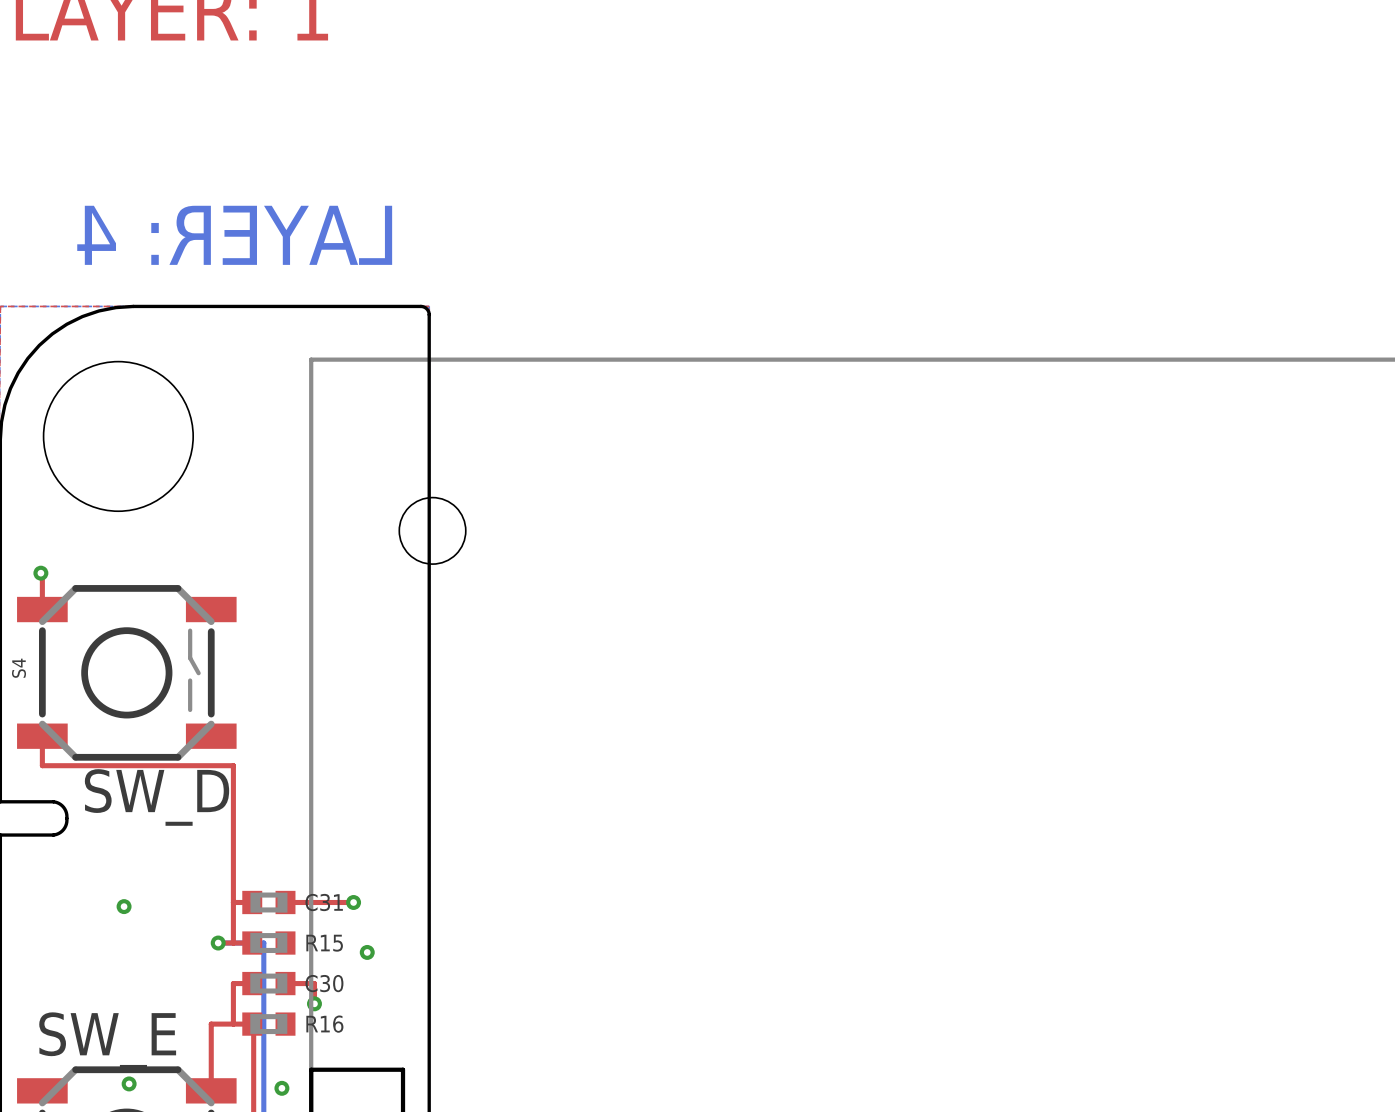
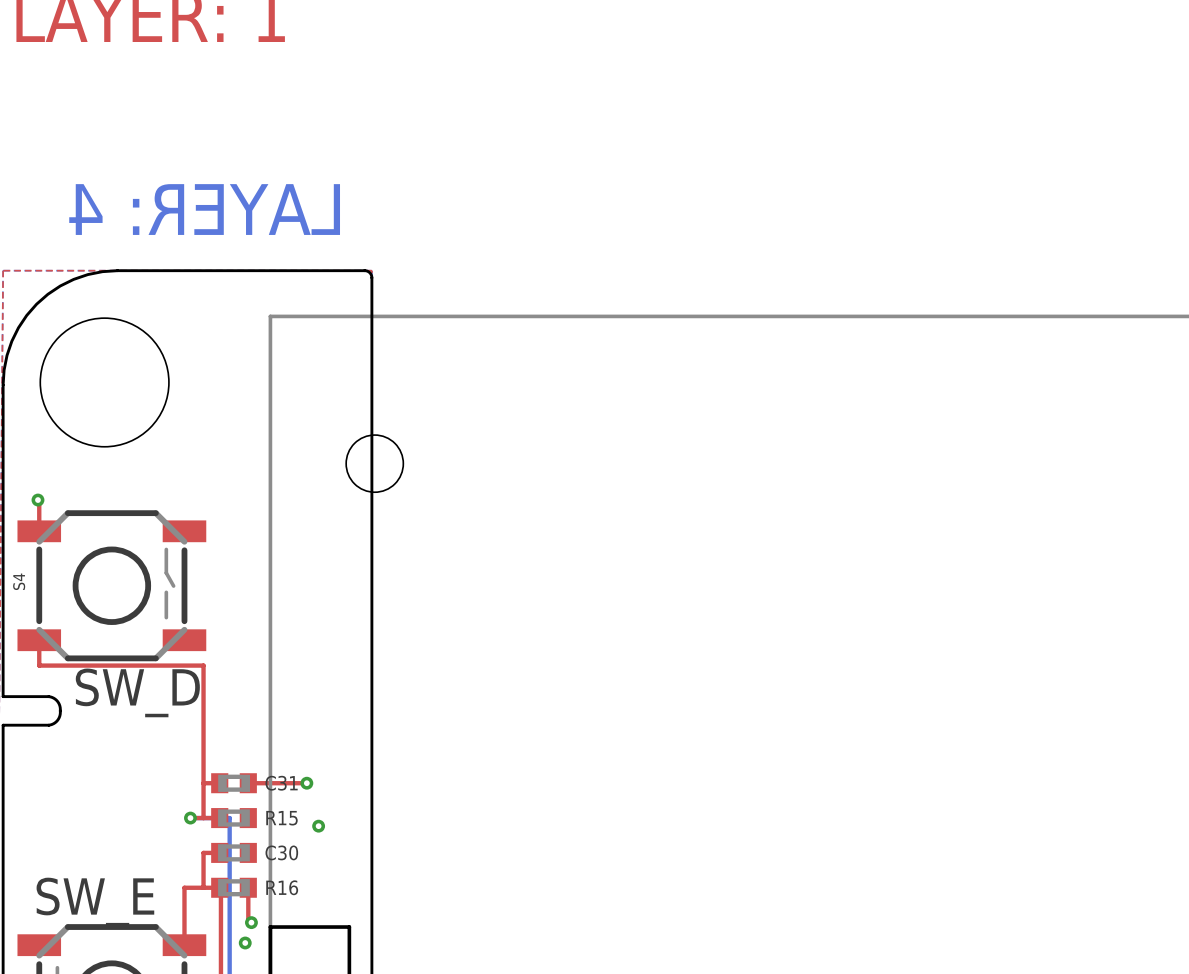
via: (124, 906) -> none
top track: (285, 983) (314, 983) (314, 1003) -> none
via position: (314, 1003) -> (251, 922)
top track: none -> (248, 887) (248, 919) (251, 922)
via: (129, 1083) -> none

